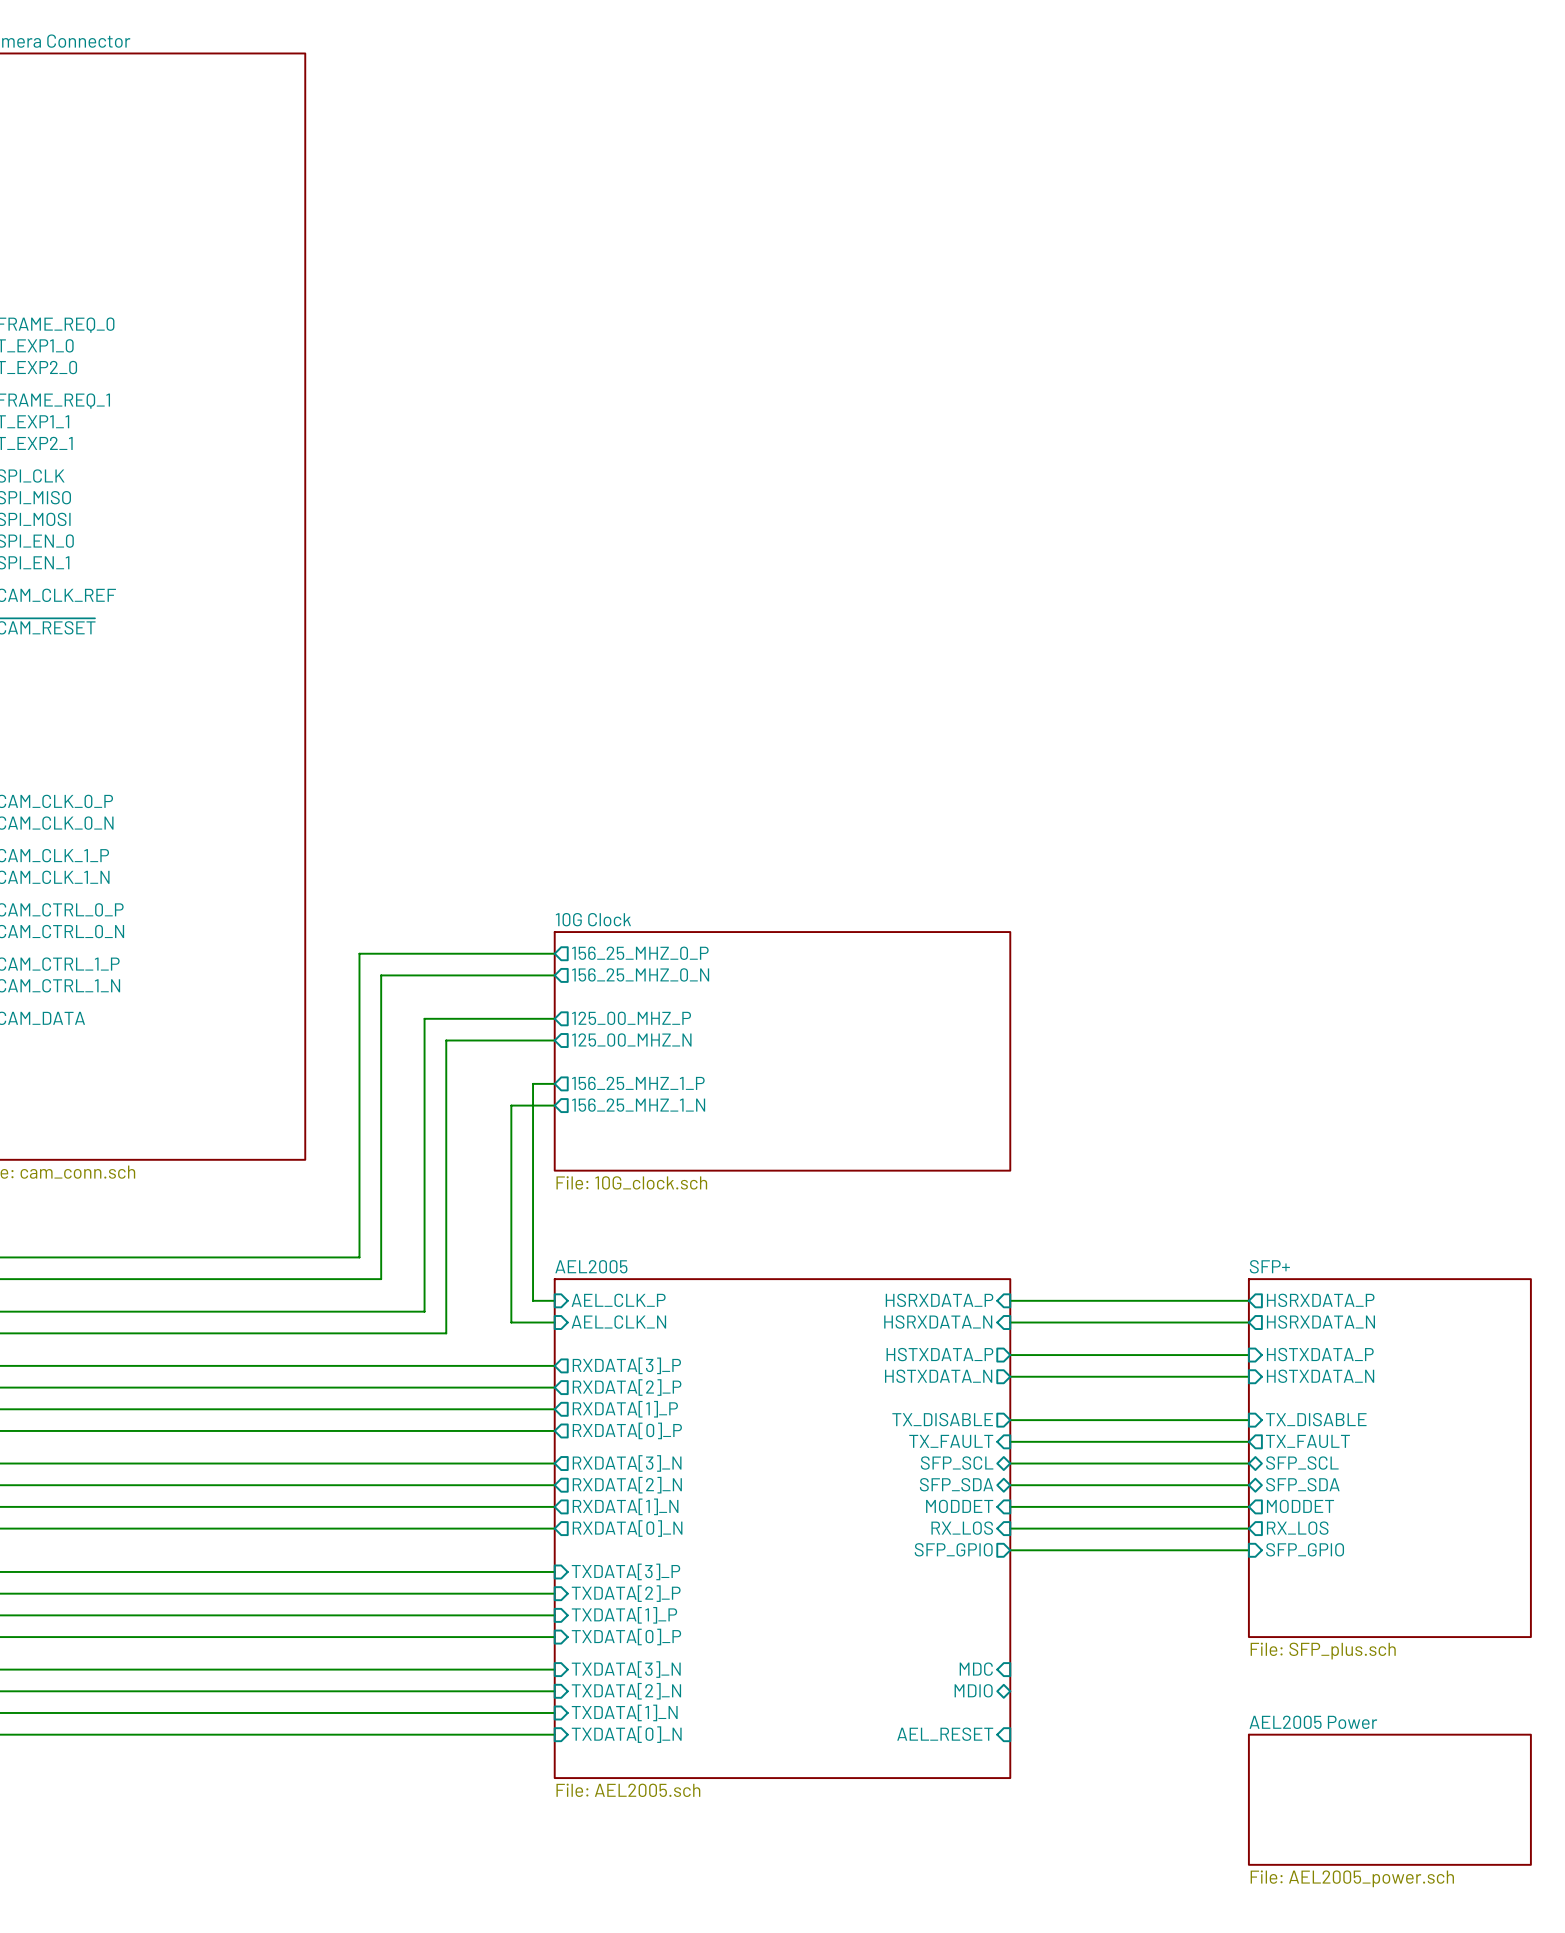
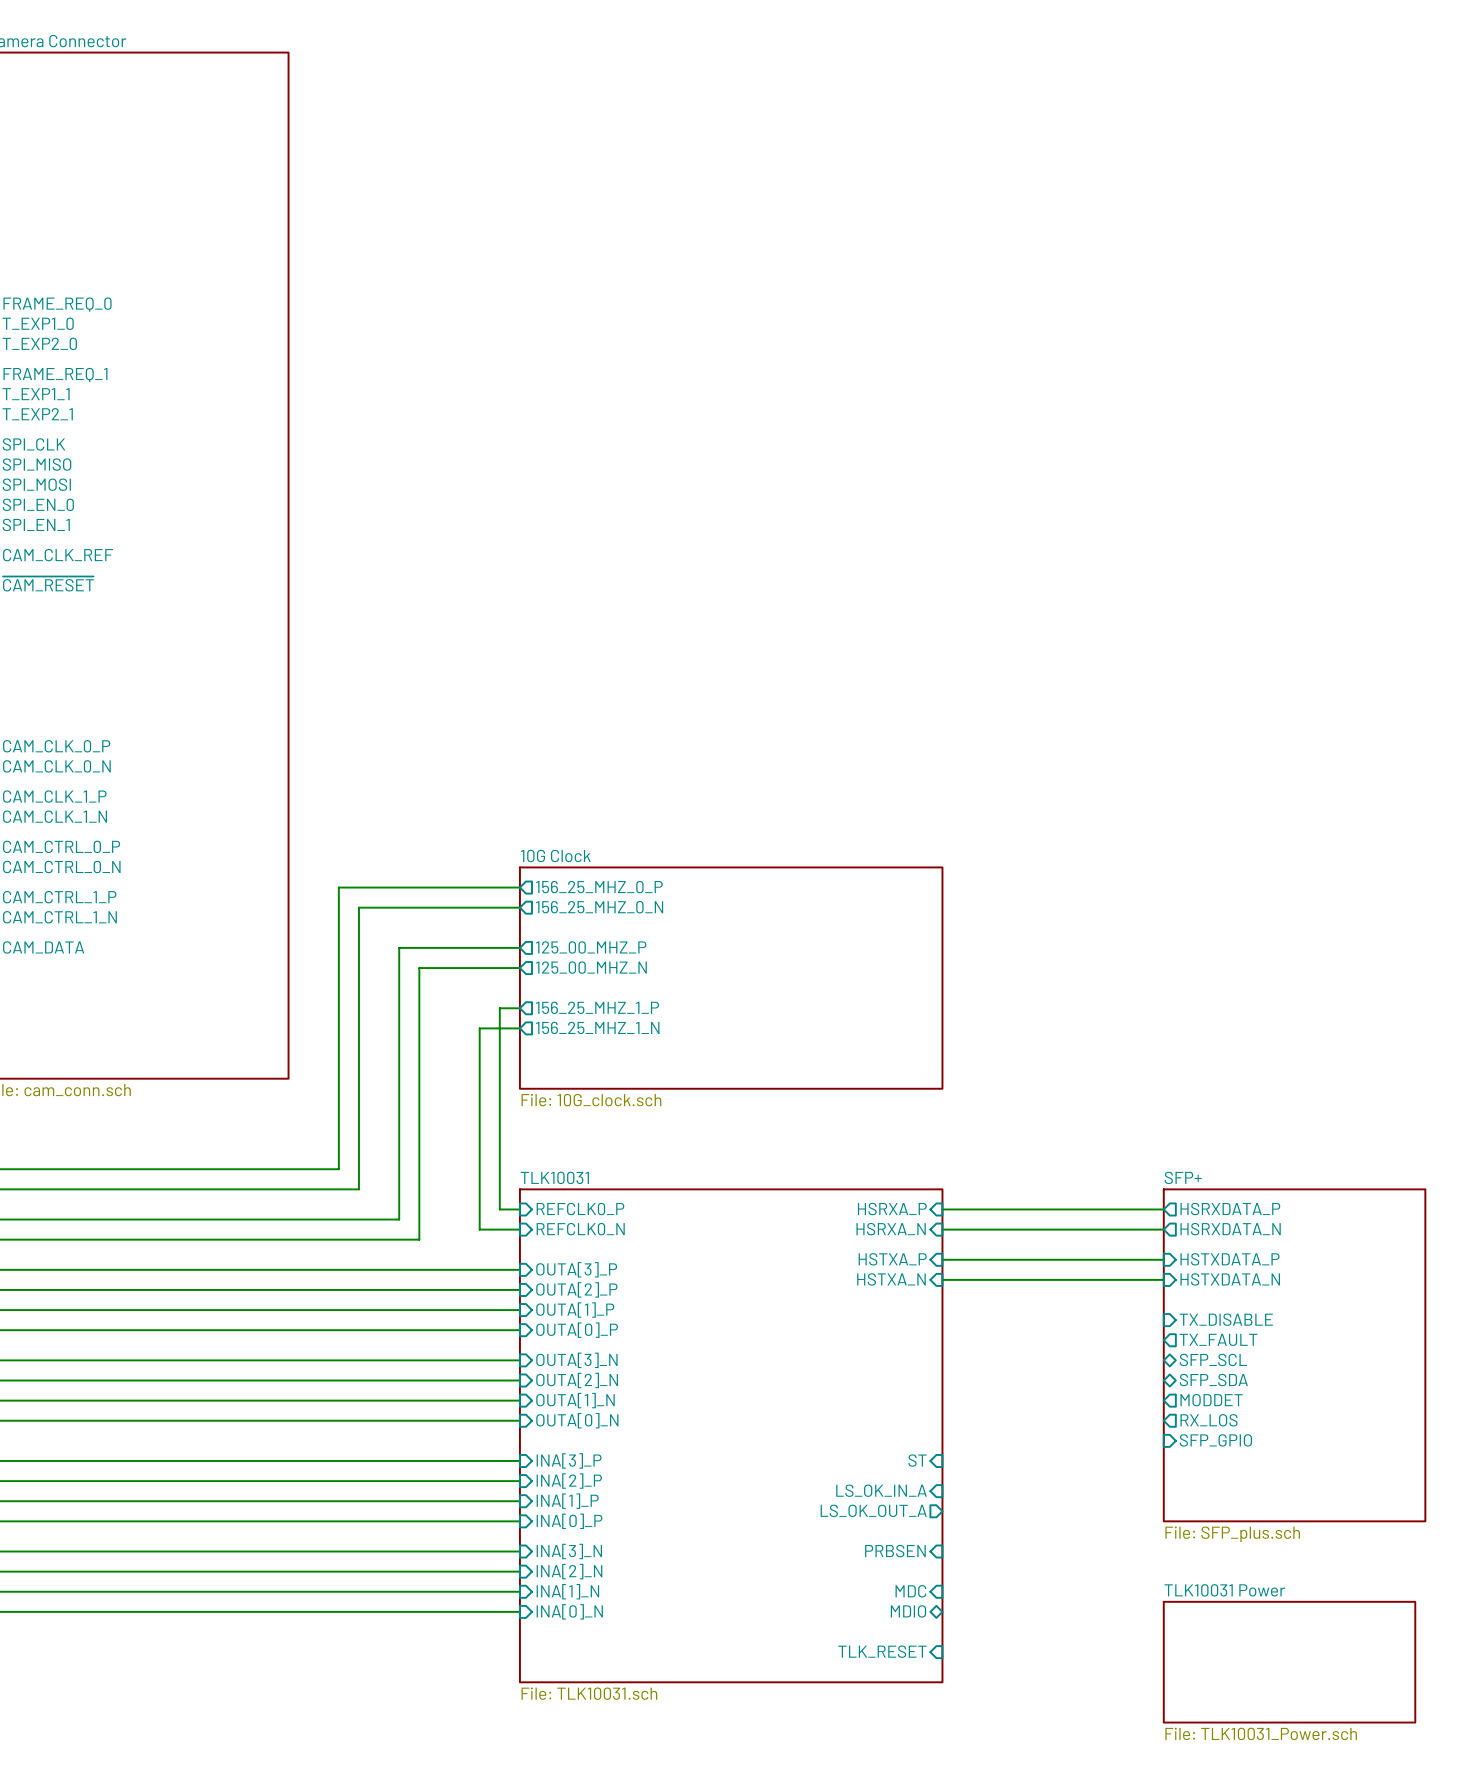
sheet pin: AEL_CLK_P (618, 1300) -> REFCLK0_P (580, 1209)
sheet pin: HSRXDATA_P (939, 1300) -> HSRXA_P (892, 1209)
sheet pin: AEL_CLK_N (618, 1322) -> REFCLK0_N (580, 1229)
sheet pin: HSRXDATA_N (938, 1322) -> HSRXA_N (891, 1229)
sheet pin shape: output (939, 1354) -> input (892, 1259)
sheet pin: HSTXDATA_P (939, 1354) -> HSTXA_P (892, 1259)
sheet pin shape: output (626, 1365) -> input (576, 1269)
sheet pin: RXDATA[3]_P (626, 1365) -> OUTA[3]_P (576, 1269)
sheet pin shape: output (938, 1376) -> input (891, 1279)
sheet pin: HSTXDATA_N (938, 1376) -> HSTXA_N (891, 1279)
sheet pin shape: output (627, 1387) -> input (576, 1289)
sheet pin: RXDATA[2]_P (627, 1387) -> OUTA[2]_P (576, 1289)
sheet pin shape: output (625, 1409) -> input (575, 1310)
sheet pin: RXDATA[1]_P (625, 1409) -> OUTA[1]_P (575, 1310)
sheet pin: TX_DISABLE (942, 1419) -> none
wire: (1010, 1420) (1248, 1420) -> none
sheet pin shape: output (627, 1430) -> input (577, 1330)
sheet pin: RXDATA[0]_P (627, 1430) -> OUTA[0]_P (577, 1330)
sheet pin: TX_FAULT (951, 1441) -> none
wire: (1010, 1441) (1248, 1441) -> none
sheet pin shape: output (627, 1463) -> input (576, 1360)
sheet pin: RXDATA[3]_N (627, 1463) -> OUTA[3]_N (576, 1360)
sheet pin: SFP_SCL (957, 1463) -> none
wire: (1010, 1463) (1248, 1463) -> none
sheet pin: SFP_SDA (956, 1484) -> none
sheet pin shape: output (627, 1485) -> input (577, 1380)
sheet pin: RXDATA[2]_N (627, 1485) -> OUTA[2]_N (577, 1380)
wire: (1010, 1485) (1248, 1485) -> none
sheet pin shape: output (625, 1506) -> input (575, 1400)
sheet pin: RXDATA[1]_N (625, 1506) -> OUTA[1]_N (575, 1400)
sheet pin: MODDET (959, 1506) -> none
wire: (1010, 1506) (1248, 1506) -> none
sheet pin shape: output (627, 1528) -> input (577, 1420)
sheet pin: RXDATA[0]_N (627, 1528) -> OUTA[0]_N (577, 1420)
sheet AEL2005: File: AEL2005.sch (782, 1528) -> none
sheet pin: RX_LOS (962, 1528) -> none
wire: (1010, 1528) (1248, 1528) -> none
sheet TLK10031: none -> File: TLK10031.sch (731, 1435)
sheet pin: SFP_GPIO (953, 1549) -> none
wire: (1010, 1550) (1248, 1550) -> none
sheet pin: TXDATA[3]_P (625, 1571) -> INA[3]_P (569, 1460)
sheet pin: none -> ST (917, 1460)
sheet pin: TXDATA[2]_P (626, 1593) -> INA[2]_P (569, 1481)
sheet pin: none -> LS_OK_IN_A (881, 1490)
sheet pin: TXDATA[1]_P (624, 1615) -> INA[1]_P (567, 1501)
sheet pin: none -> LS_OK_OUT_A (873, 1510)
sheet pin: TXDATA[0]_P (626, 1637) -> INA[0]_P (569, 1521)
sheet pin: TXDATA[3]_N (626, 1669) -> INA[3]_N (569, 1551)
sheet pin: MDC (976, 1669) -> PRBSEN (895, 1551)
sheet pin: MDIO (973, 1690) -> none
sheet pin: TXDATA[2]_N (626, 1691) -> INA[2]_N (569, 1571)
sheet pin: TXDATA[1]_N (624, 1712) -> INA[1]_N (567, 1591)
sheet pin: none -> MDC (910, 1591)
sheet pin: TXDATA[0]_N (626, 1734) -> INA[0]_N (569, 1611)
sheet pin shape: input (945, 1734) -> bidirectional (908, 1611)
sheet pin: AEL_RESET (945, 1734) -> MDIO (908, 1611)
sheet pin: none -> TLK_RESET (882, 1651)
sheet TLK10031 Power: none -> File: TLK10031_Power.sch (1289, 1662)
sheet AEL2005 Power: File: AEL2005_power.sch (1389, 1799) -> none

